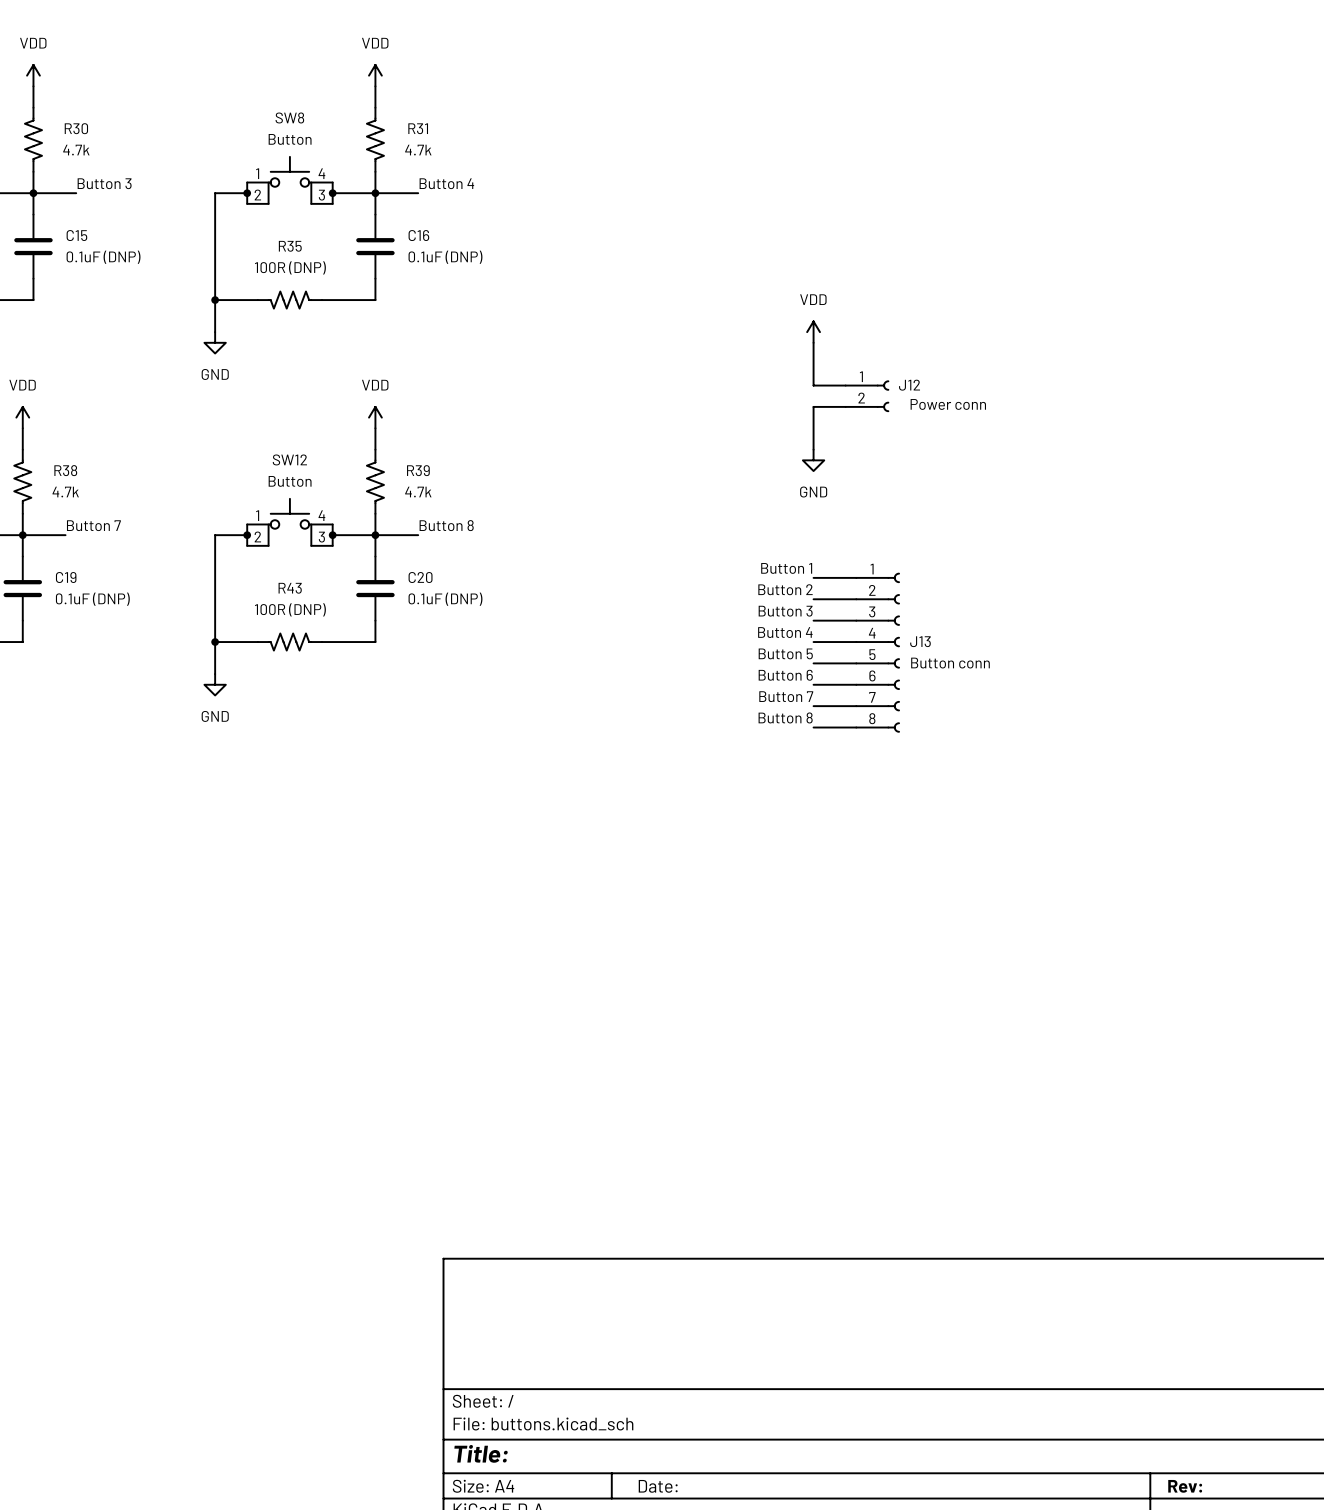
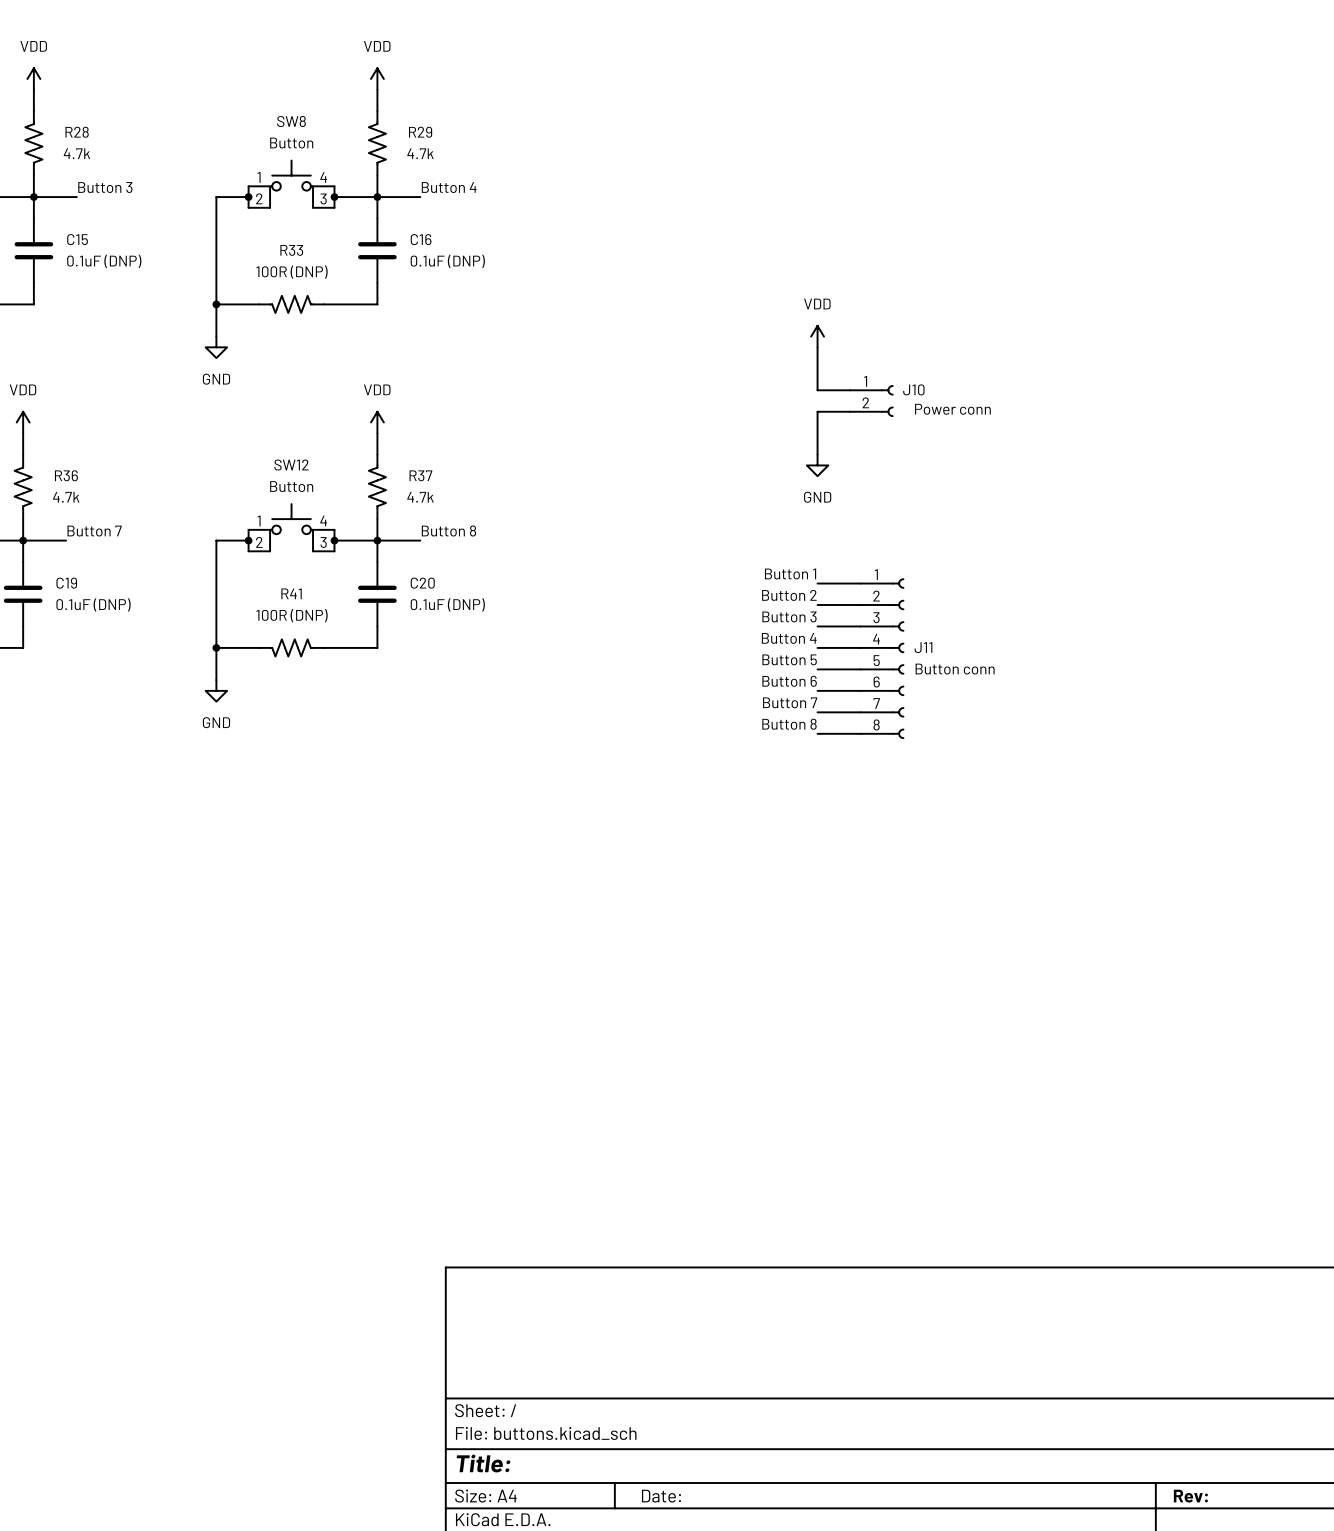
R30 name: R30 (76, 128) -> R28 (77, 132)
R31 name: R31 (418, 128) -> R29 (420, 132)
R35 name: R35 (290, 246) -> R33 (291, 250)
J12 name: J12 (909, 385) -> J10 (913, 389)
R38 name: R38 (65, 470) -> R36 (66, 475)
R39 name: R39 (418, 470) -> R37 (420, 475)
R43 name: R43 (290, 588) -> R41 (291, 593)
J13 name: J13 (920, 641) -> J11 (923, 647)

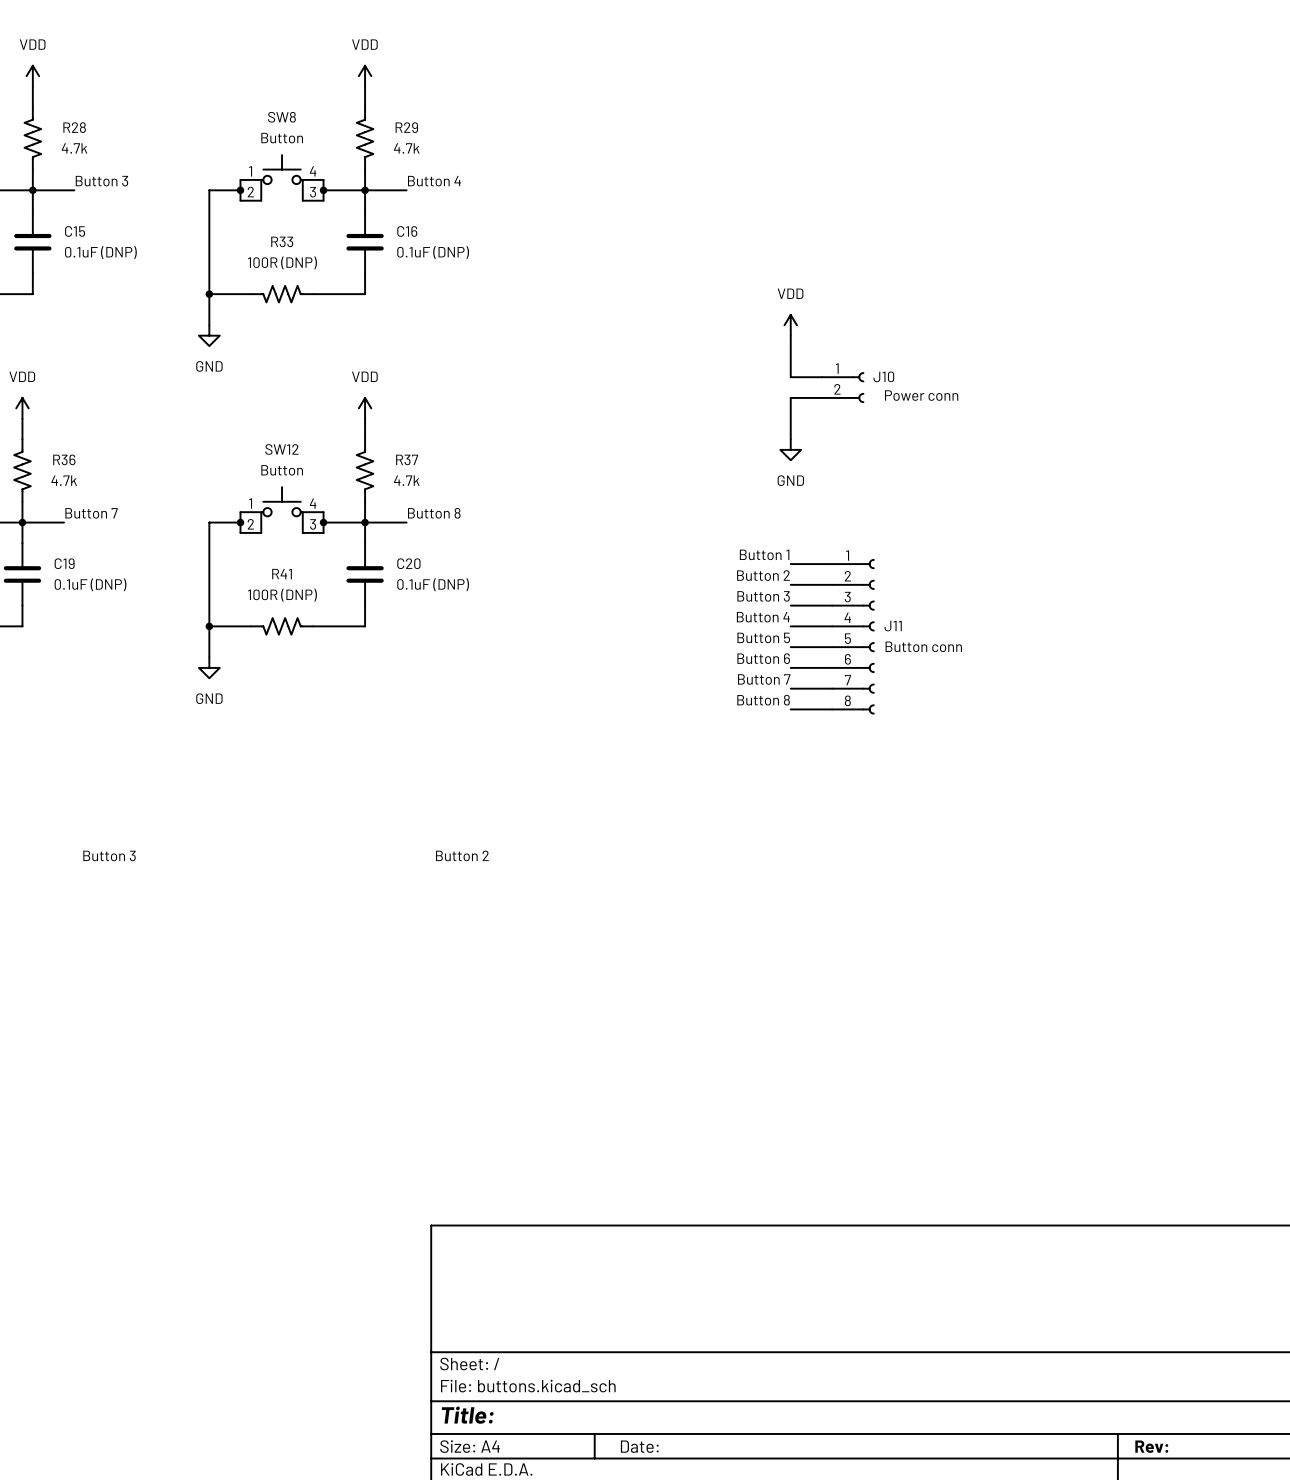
label: none -> Button 3 (109, 855)
label: none -> Button 2 (462, 855)

